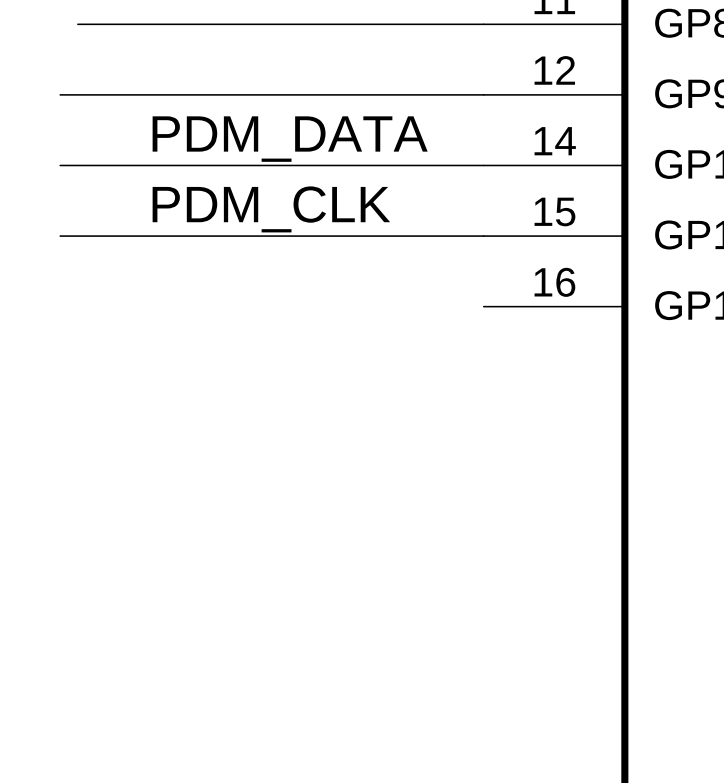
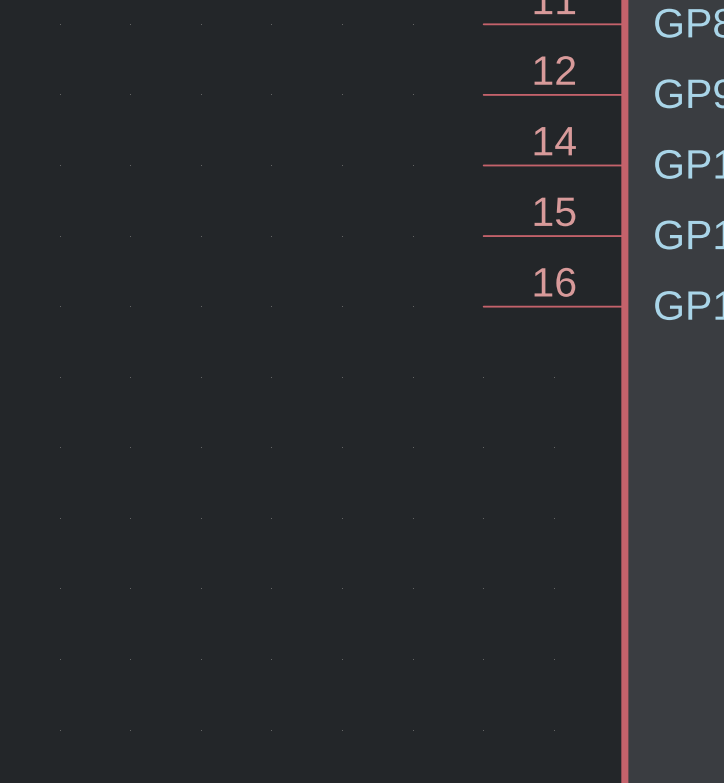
wire: (77, 24) (483, 24) -> none
wire: (60, 94) (483, 94) -> none
label: PDM_DATA (290, 139) -> none
wire: (60, 165) (483, 165) -> none
label: PDM_CLK (271, 209) -> none
wire: (60, 236) (483, 236) -> none

